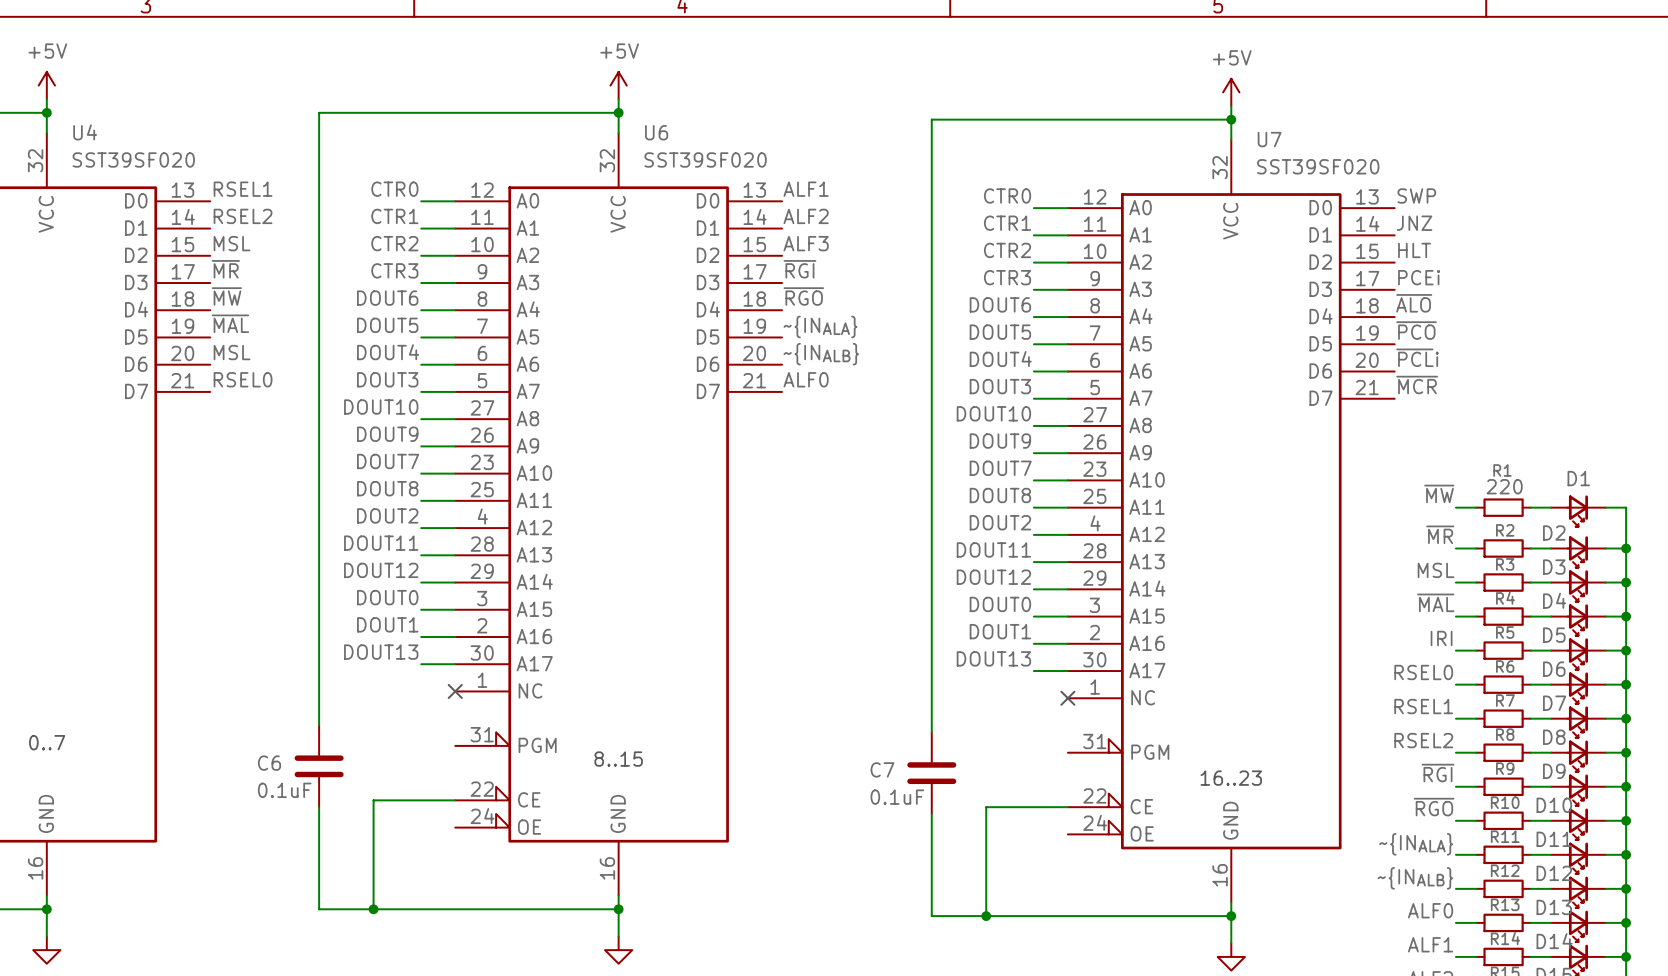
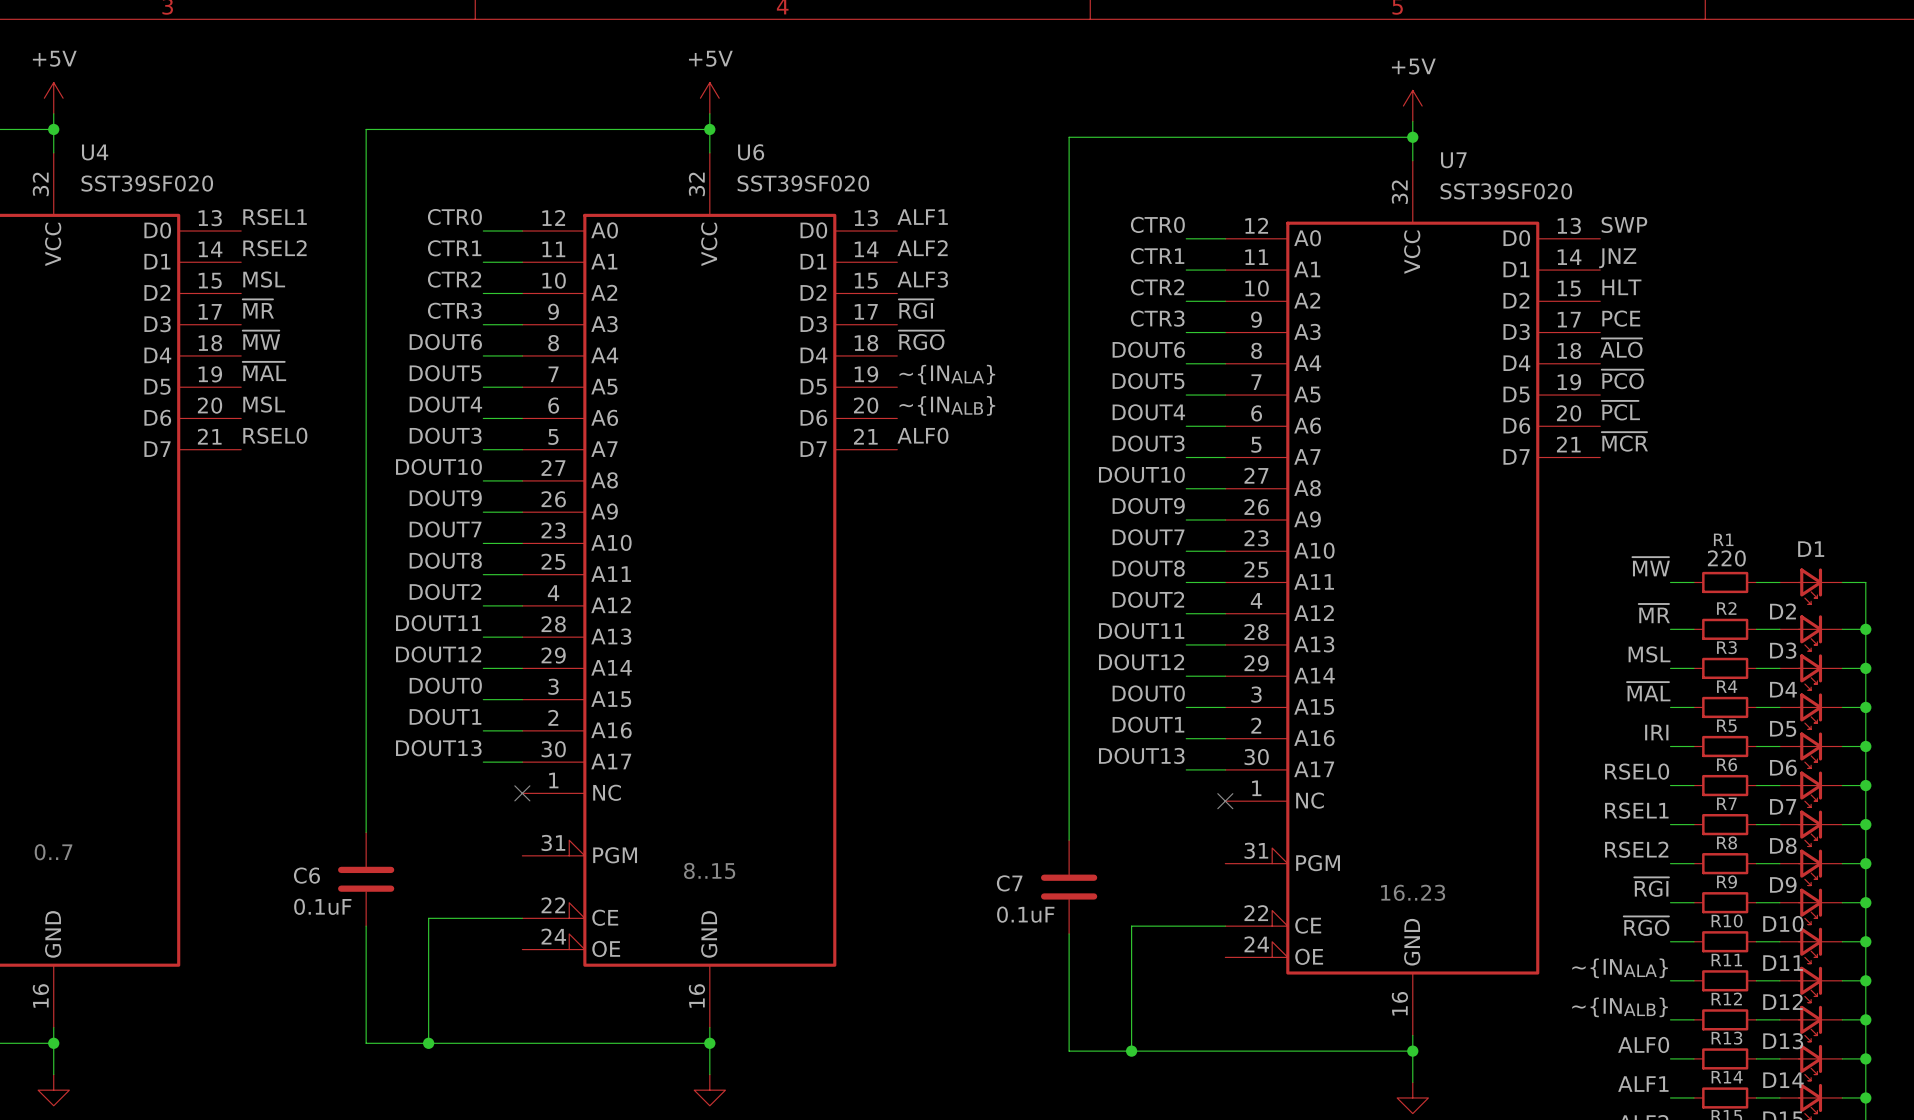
label: PCEi (1419, 277) -> PCE (1621, 318)
label: ~{PCL}i (1417, 357) -> ~{PCL} (1620, 410)

